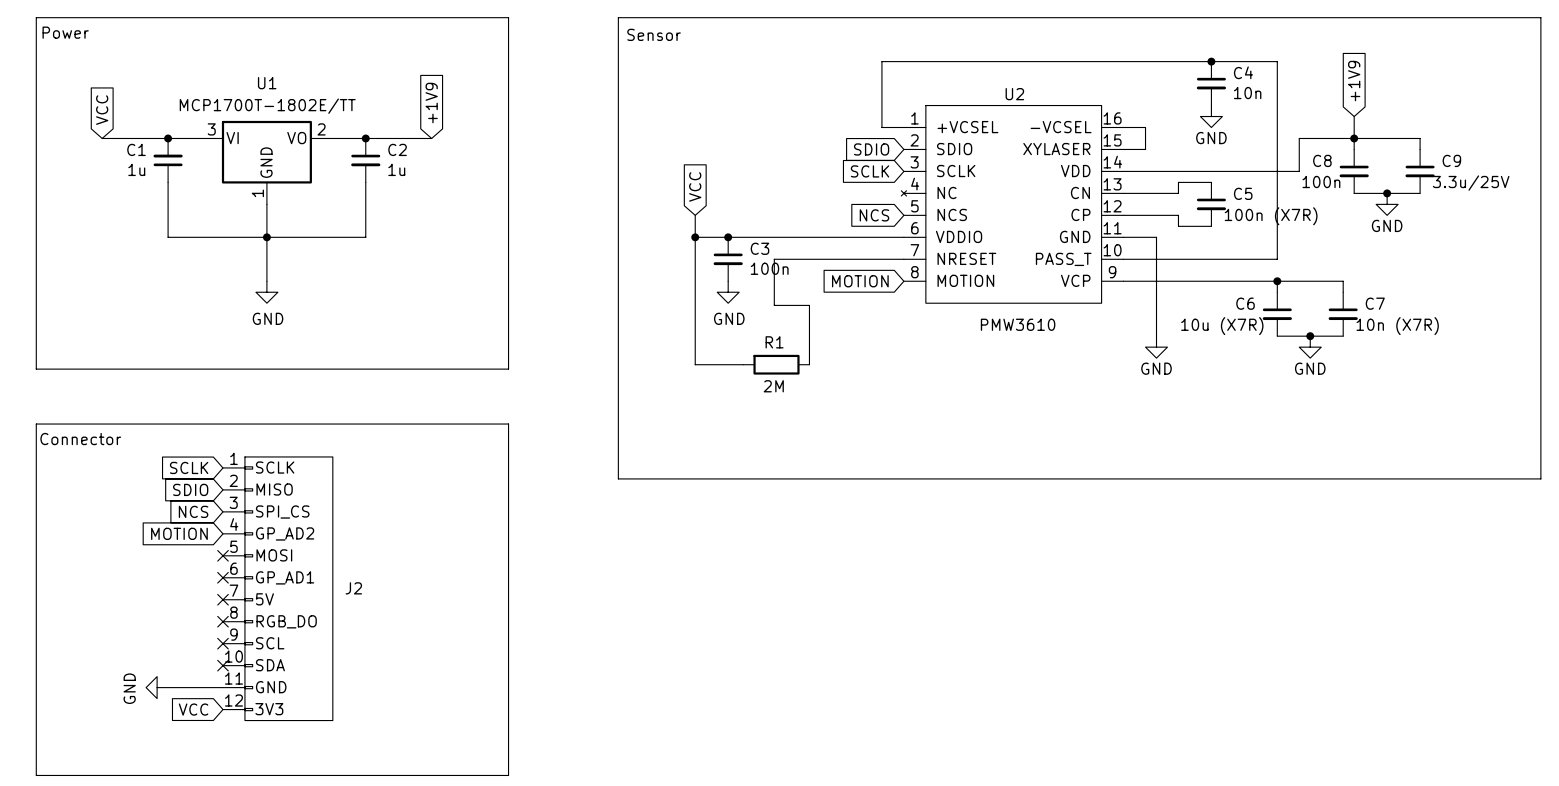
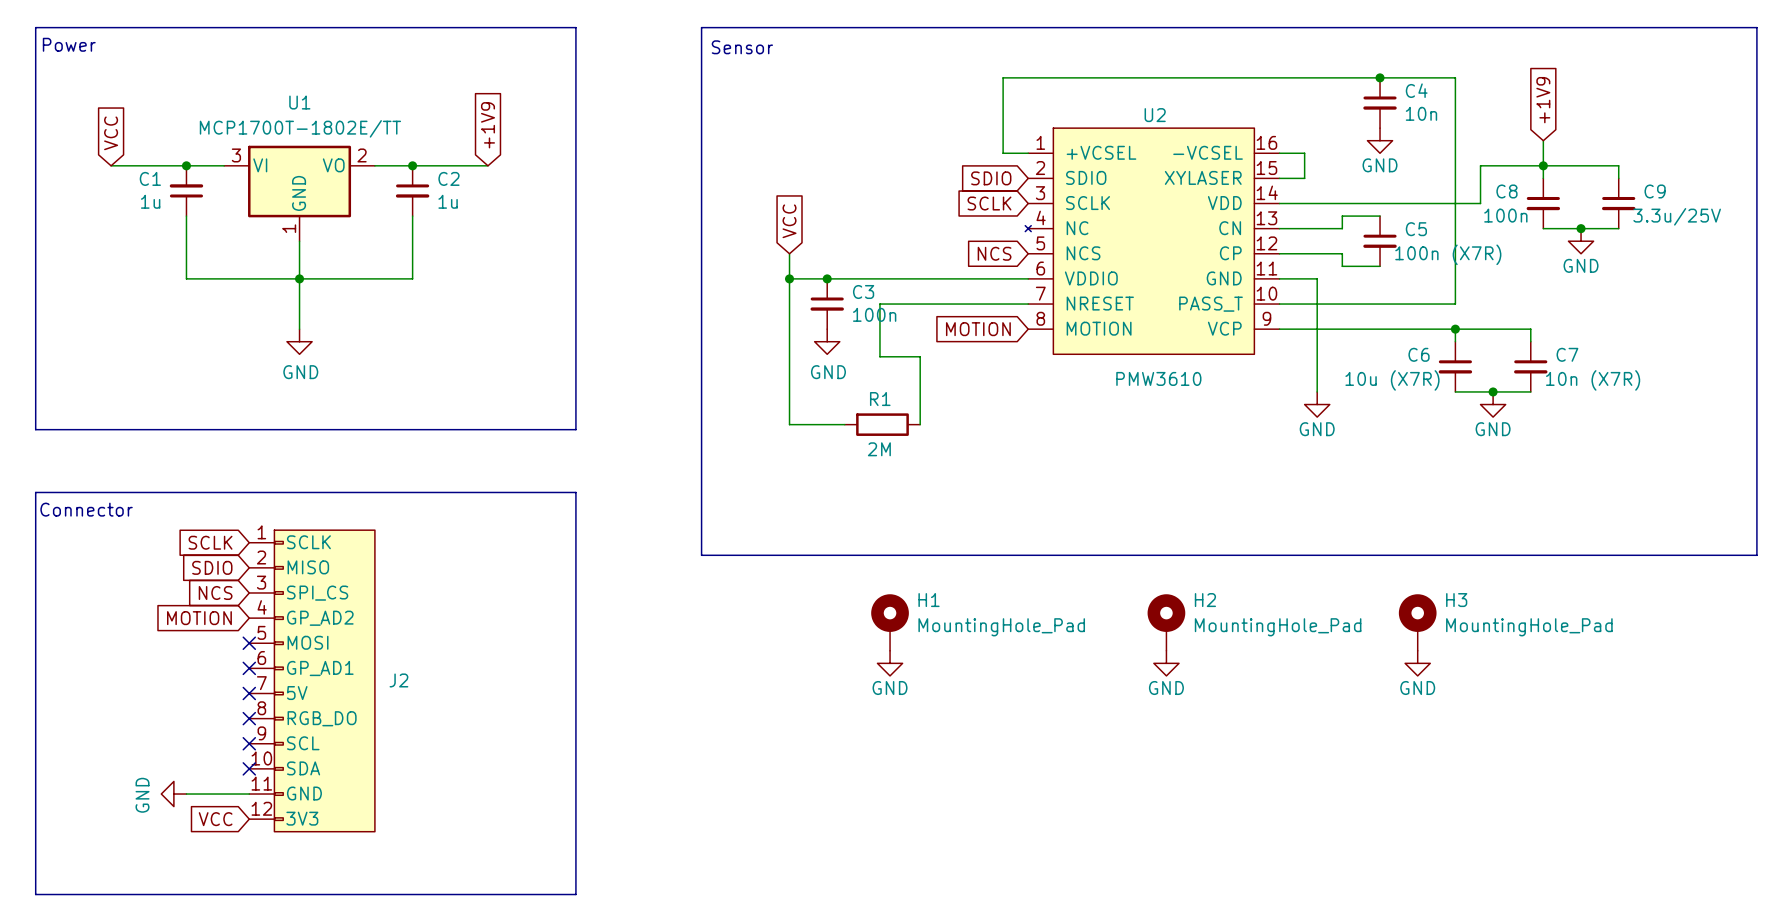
H1: none -> MountingHole_Pad (890, 622)
H2: none -> MountingHole_Pad (1166, 622)
H3: none -> MountingHole_Pad (1417, 622)
power symbol: none -> GND (890, 663)
power symbol: none -> GND (1166, 663)
power symbol: none -> GND (1417, 663)

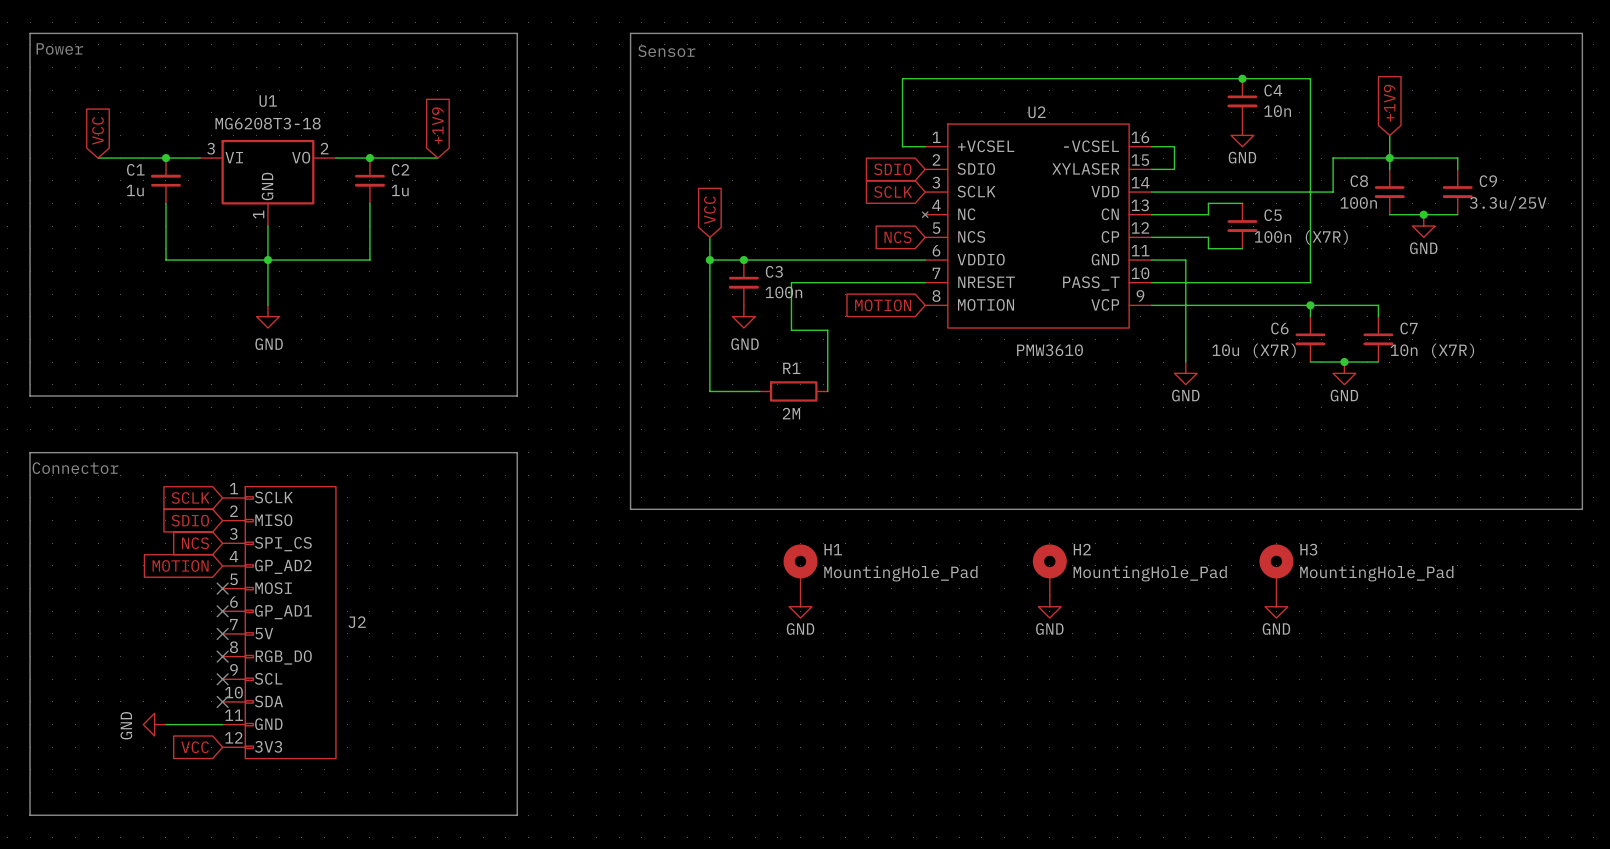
U1 value: MCP1700T-1802E/TT (300, 128) -> MG6208T3-18 (268, 123)

